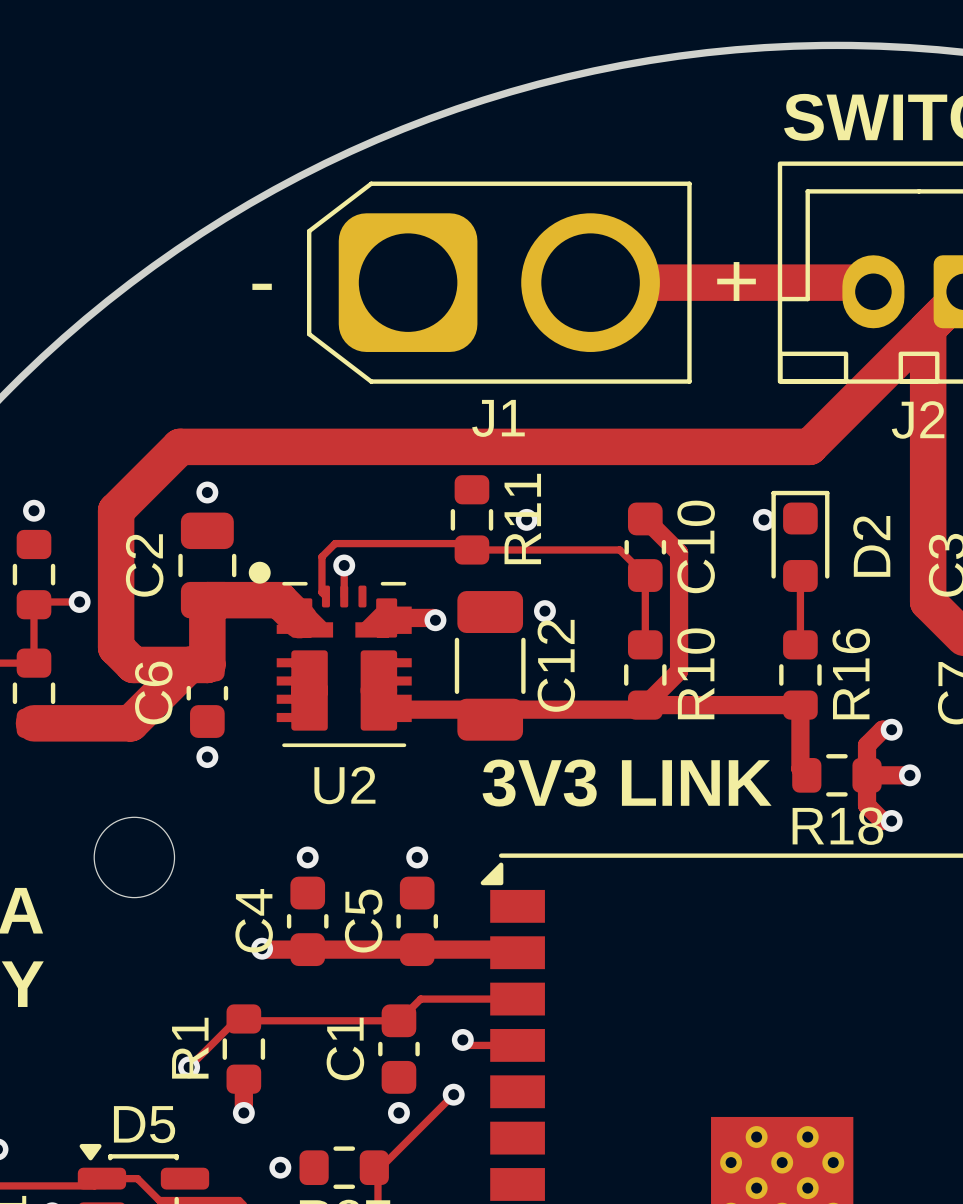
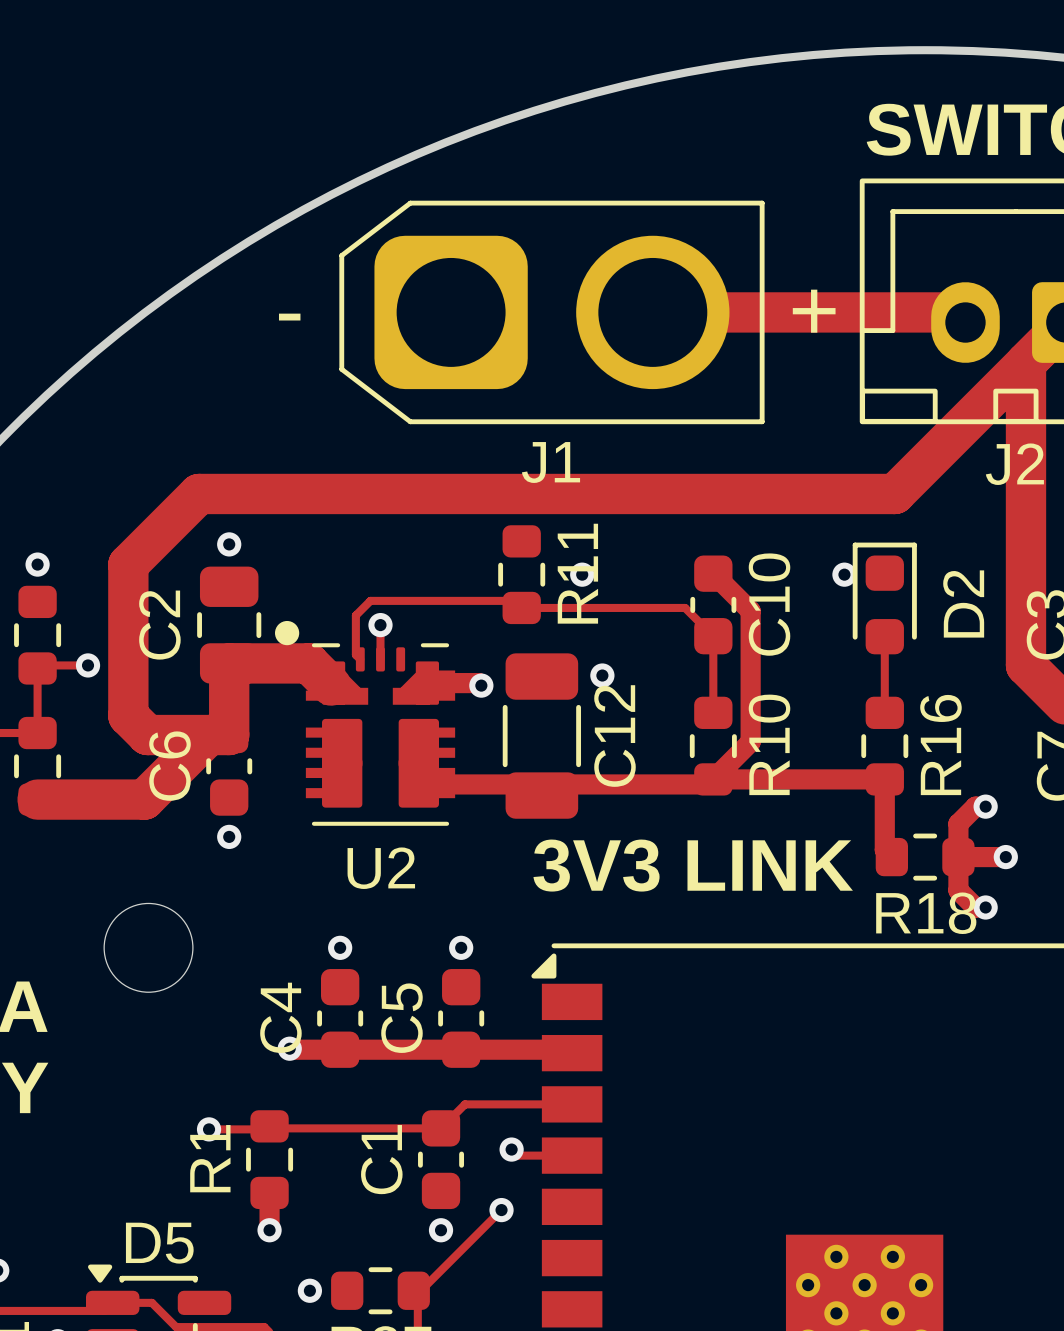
track: (234, 1021) (189, 1067) -> (259, 1129) (209, 1129)
via position: (189, 1067) -> (209, 1129)

